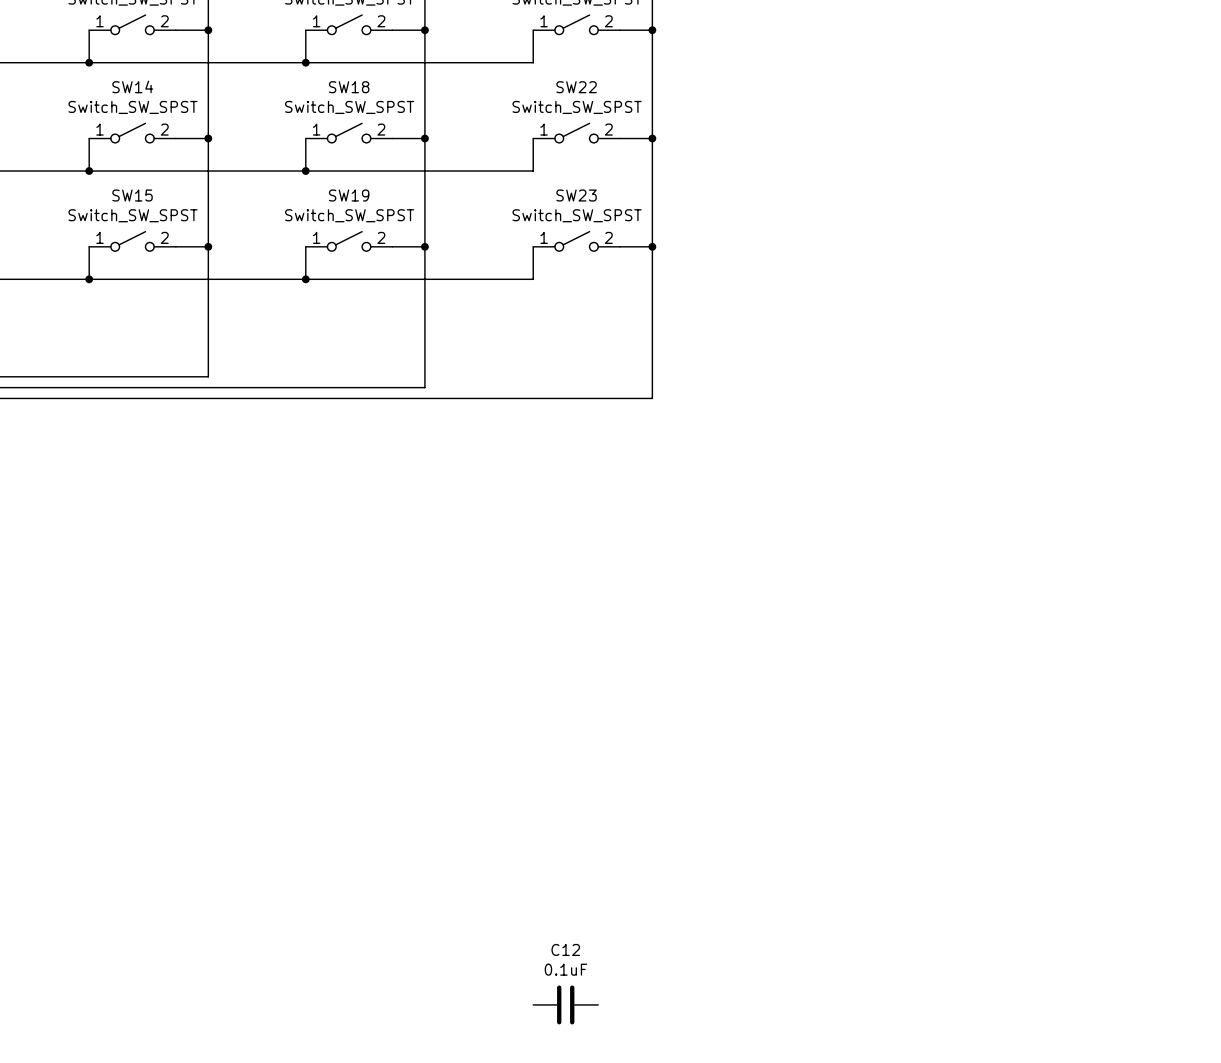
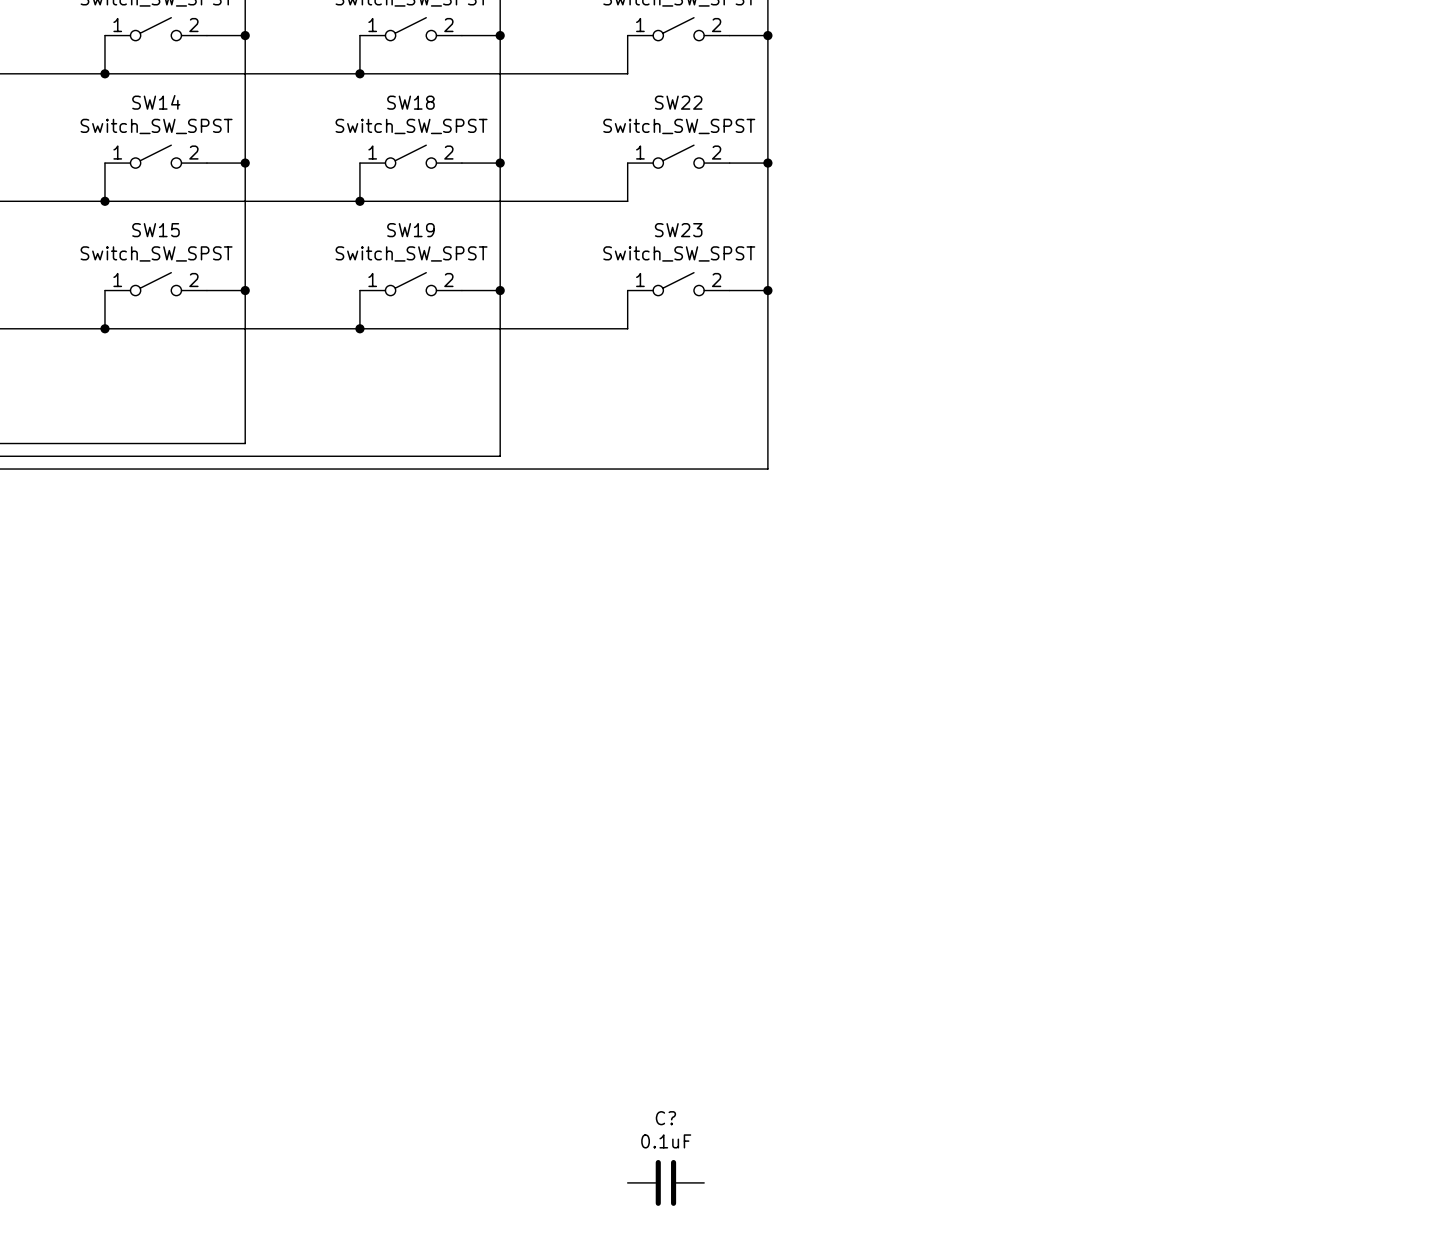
C12 name: C12 (565, 949) -> C? (665, 1118)

